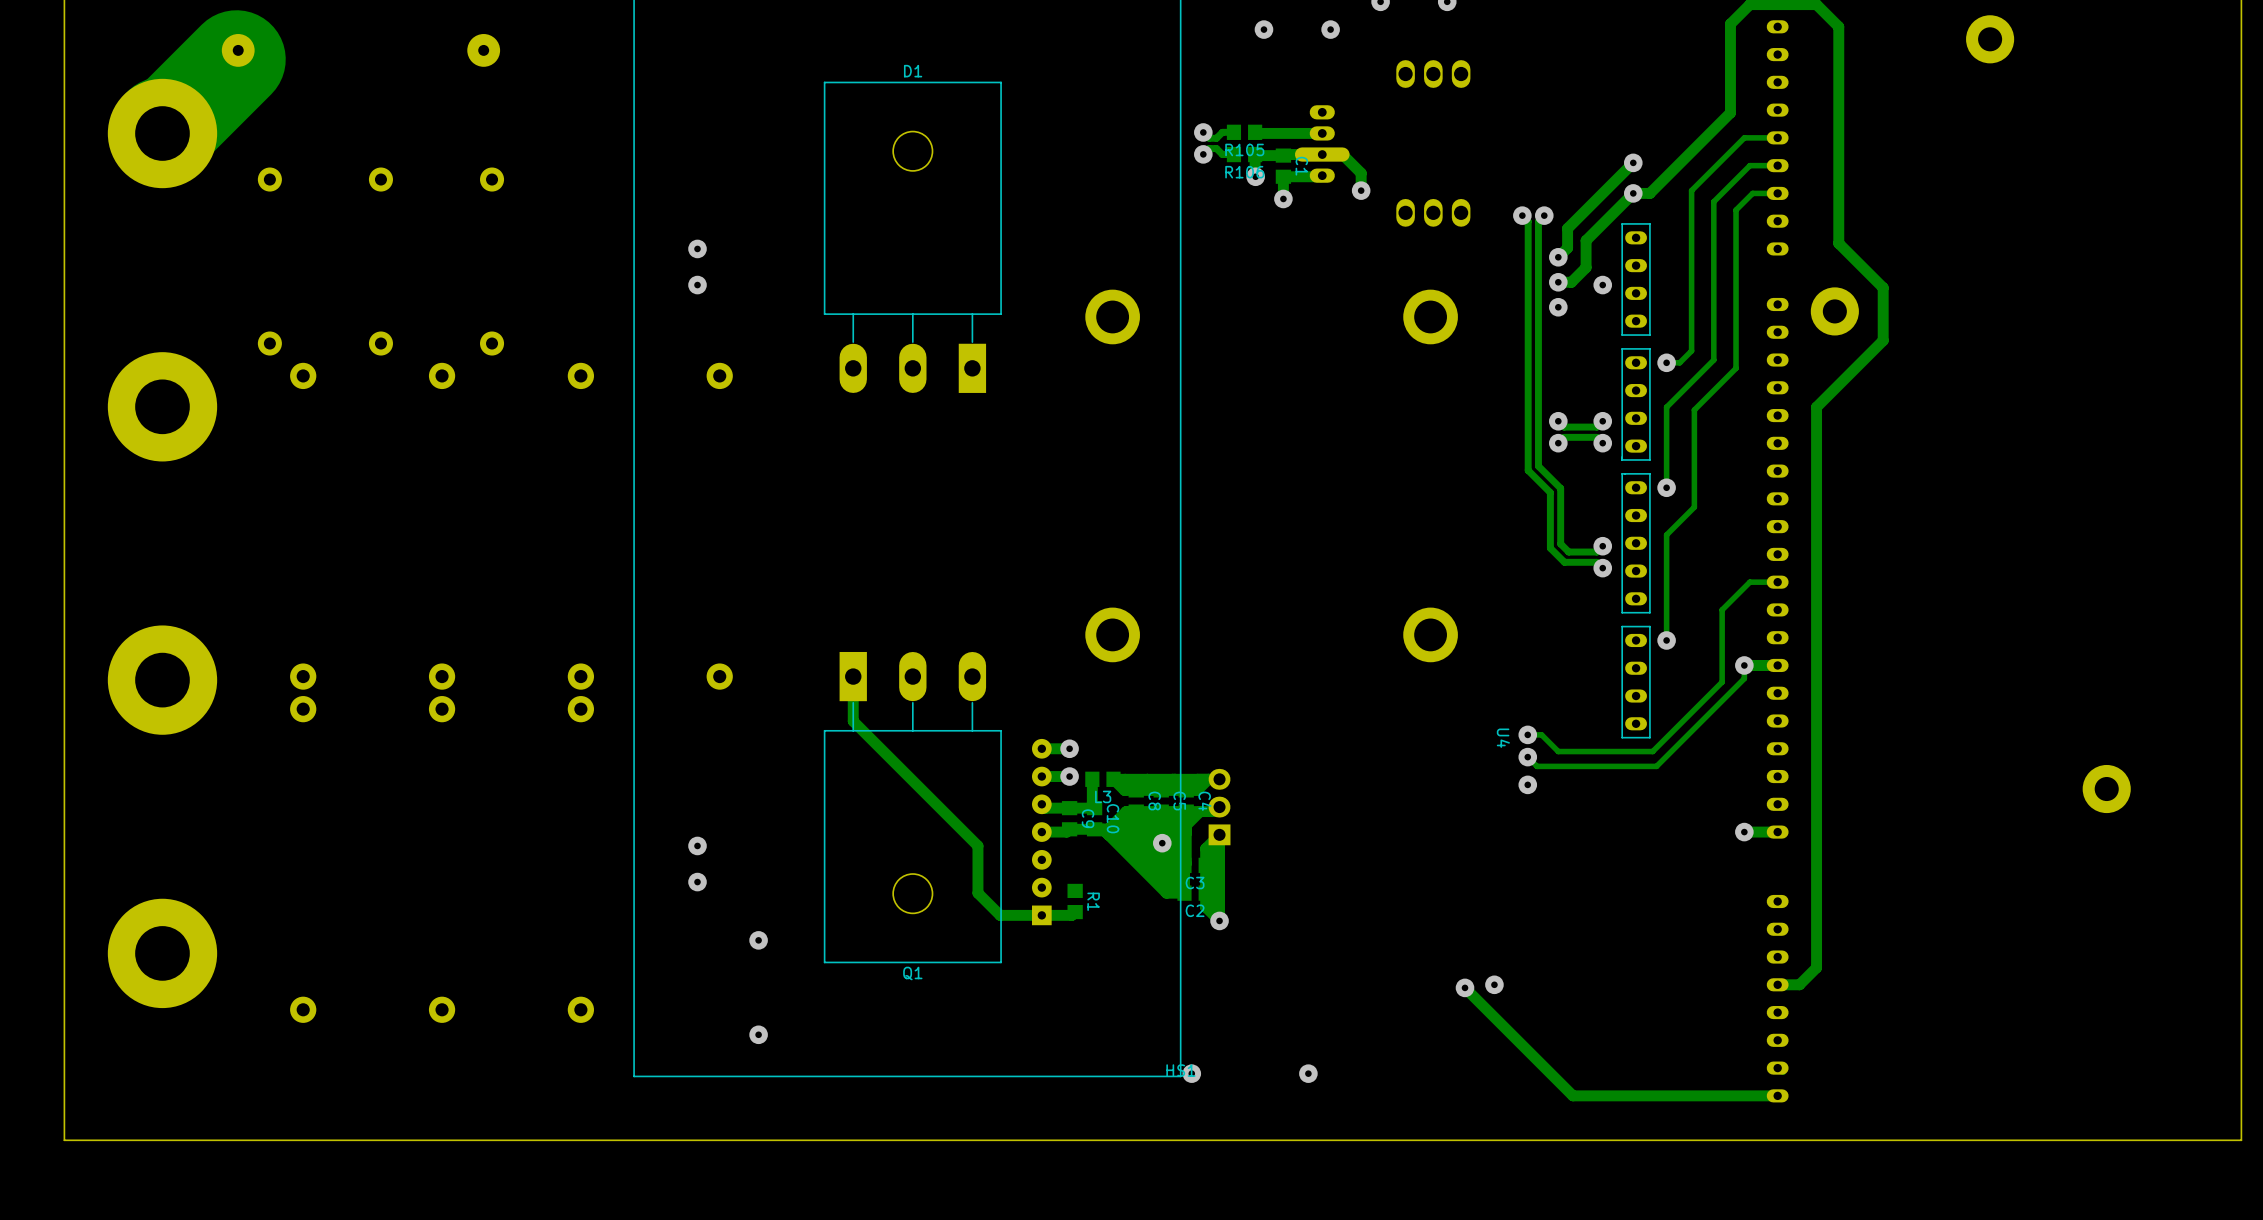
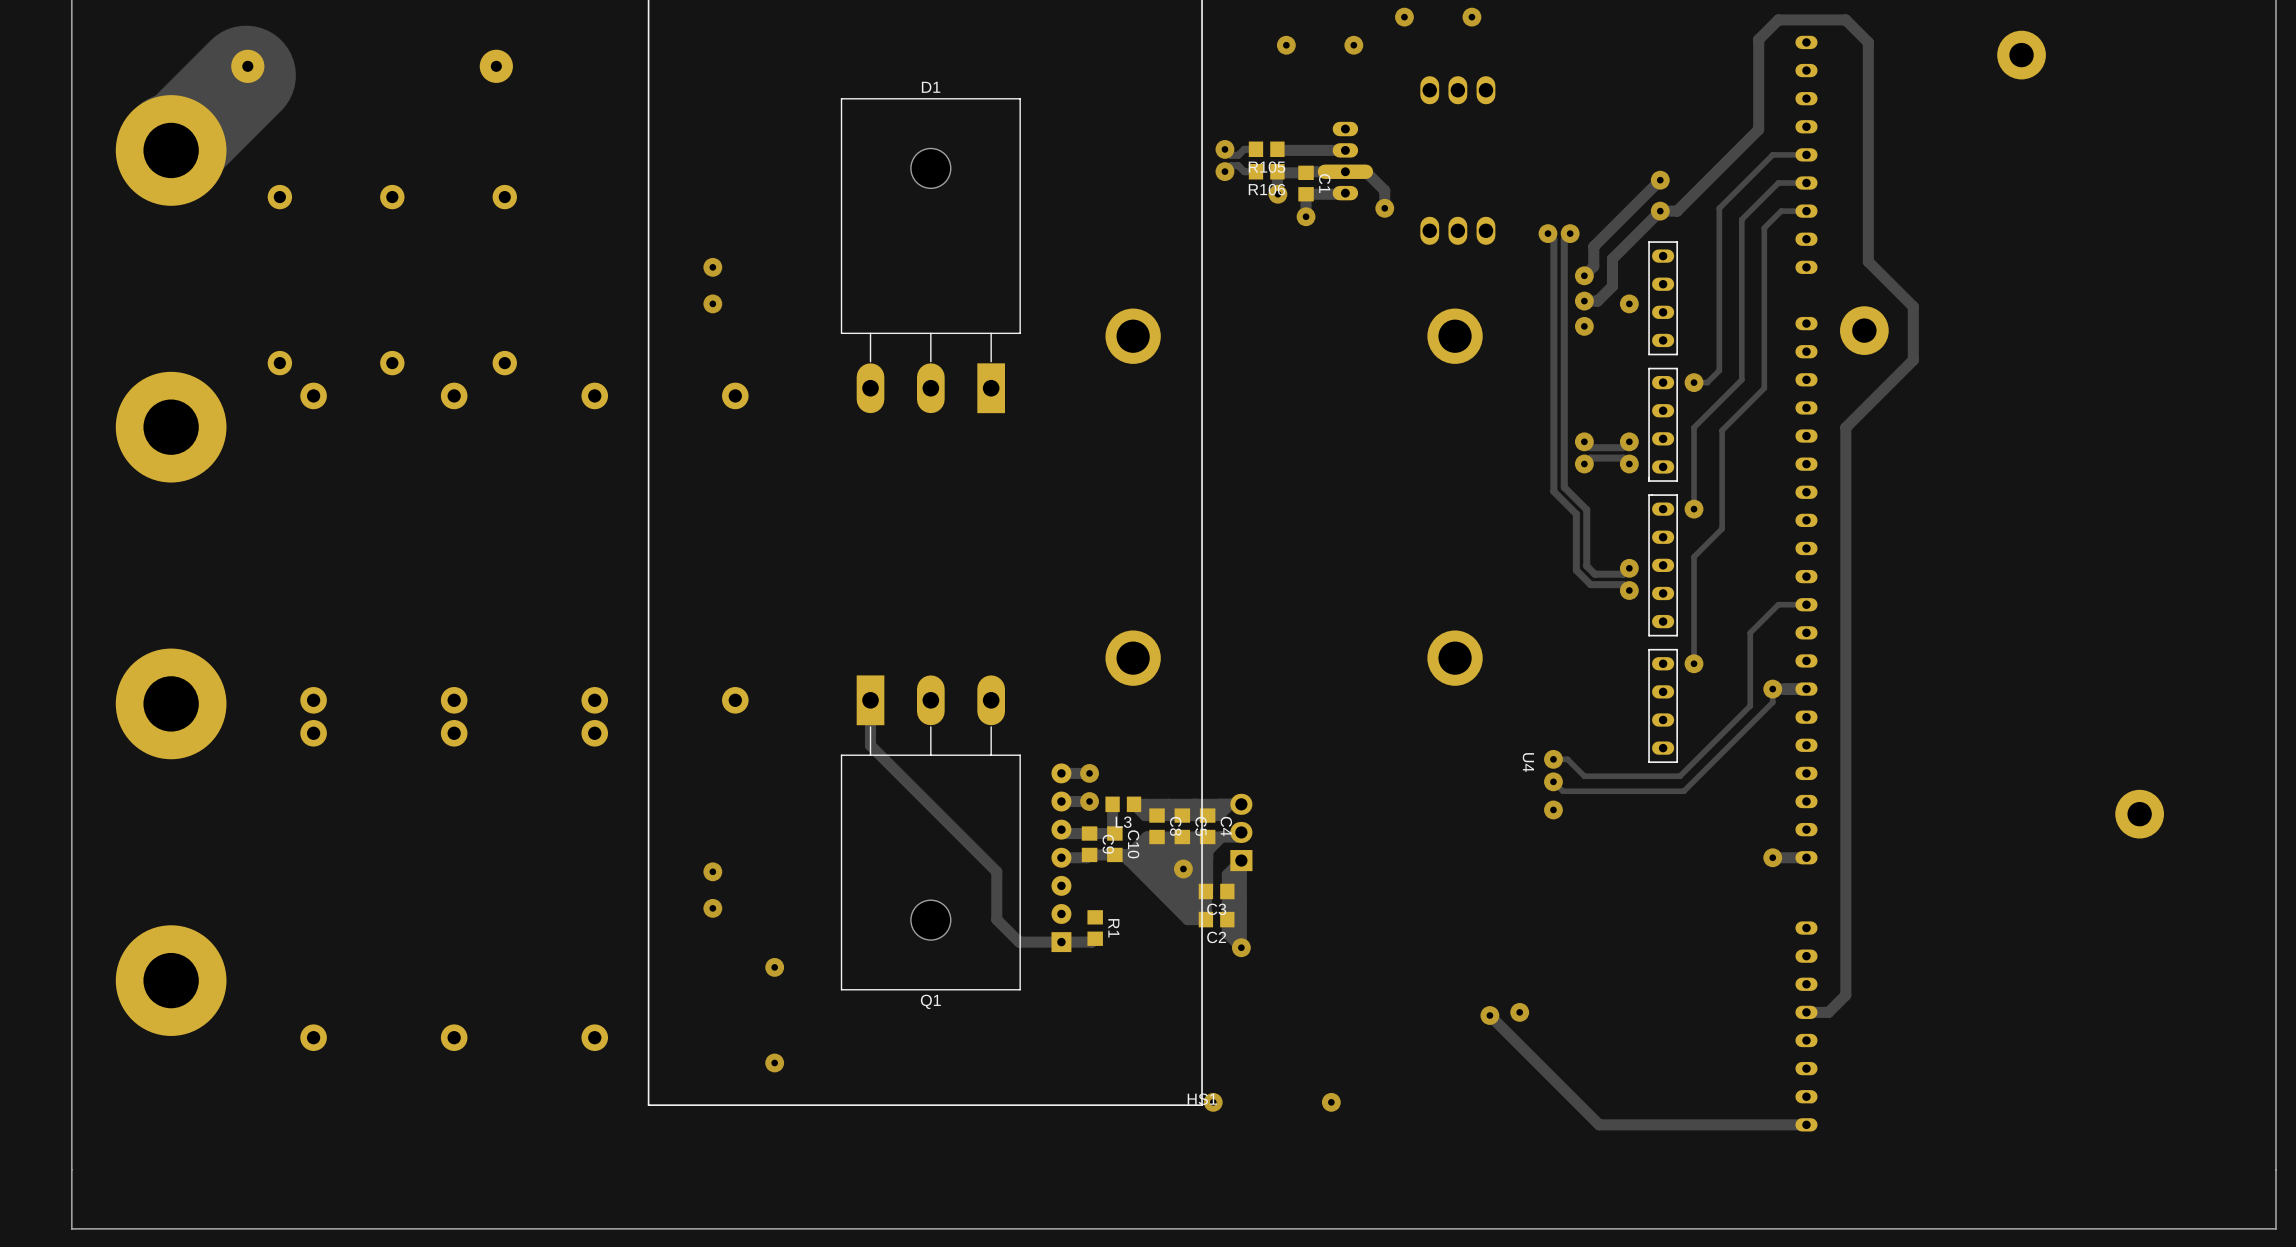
board edge: (2241, 1140) (64, 1140) -> (2275, 1169) (2275, 1228) (71, 1228) (71, 1169)

